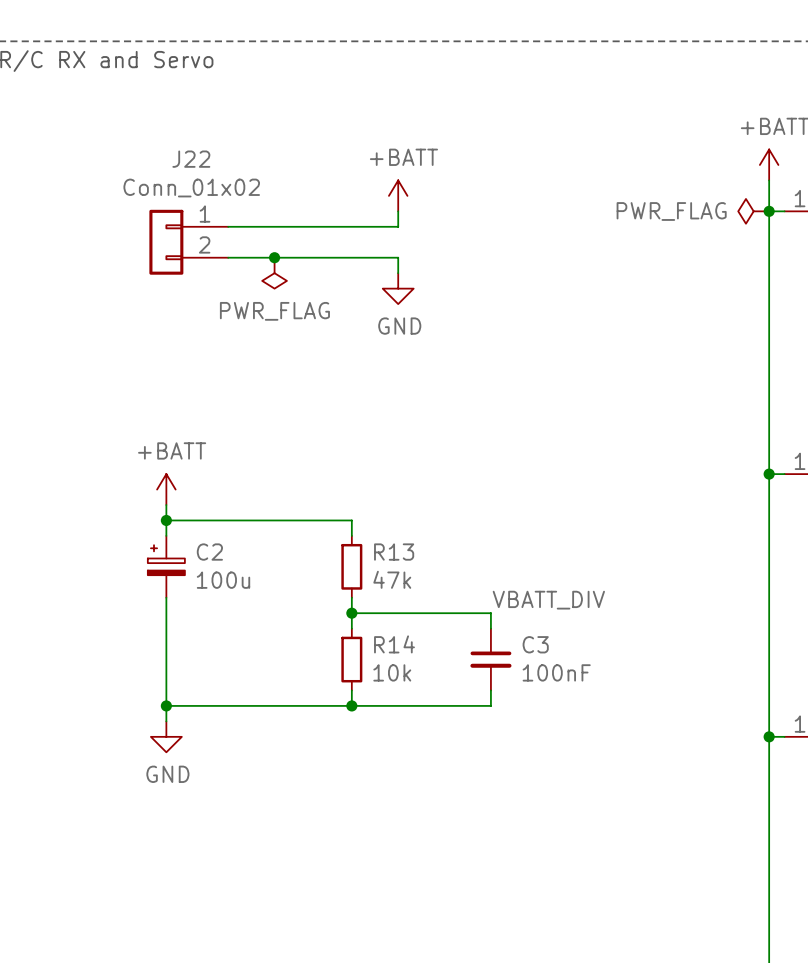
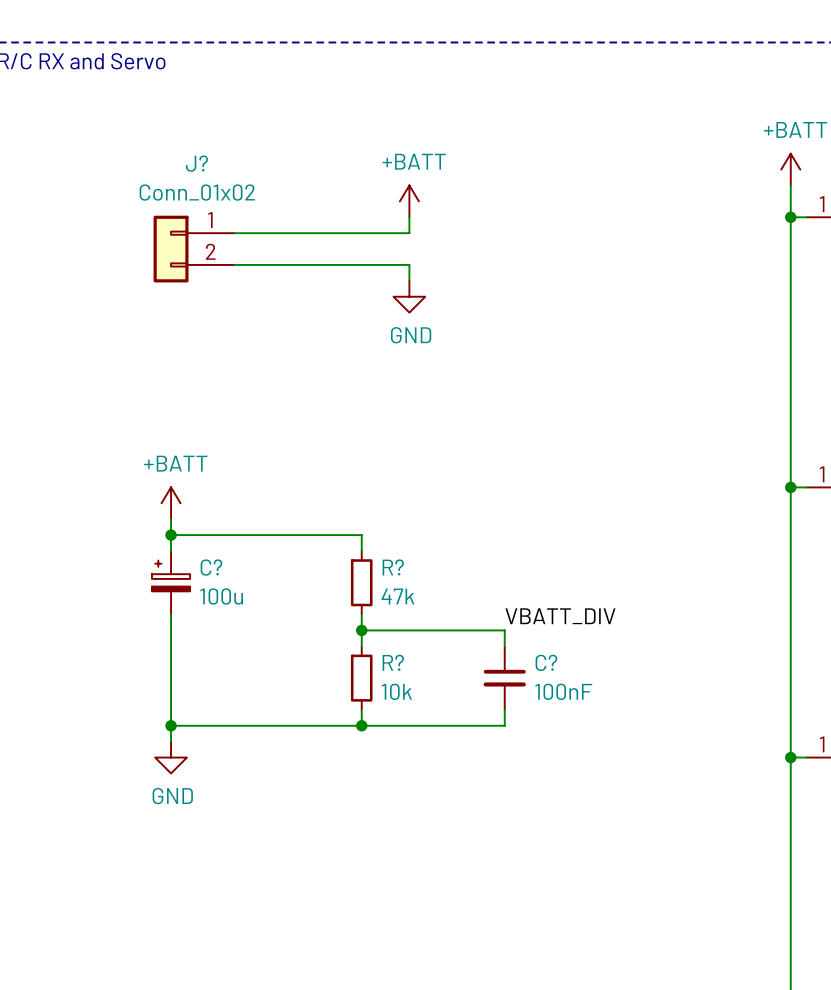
J22 name: J22 (191, 159) -> J? (196, 163)
power symbol: PWR_FLAG (753, 211) -> none
junction: (274, 257) -> none
power symbol: PWR_FLAG (274, 273) -> none
C2 name: C2 (209, 552) -> C? (211, 567)
R13 name: R13 (394, 552) -> R? (393, 567)
R14 name: R14 (394, 644) -> R? (393, 662)
C3 name: C3 (535, 644) -> C? (546, 662)

